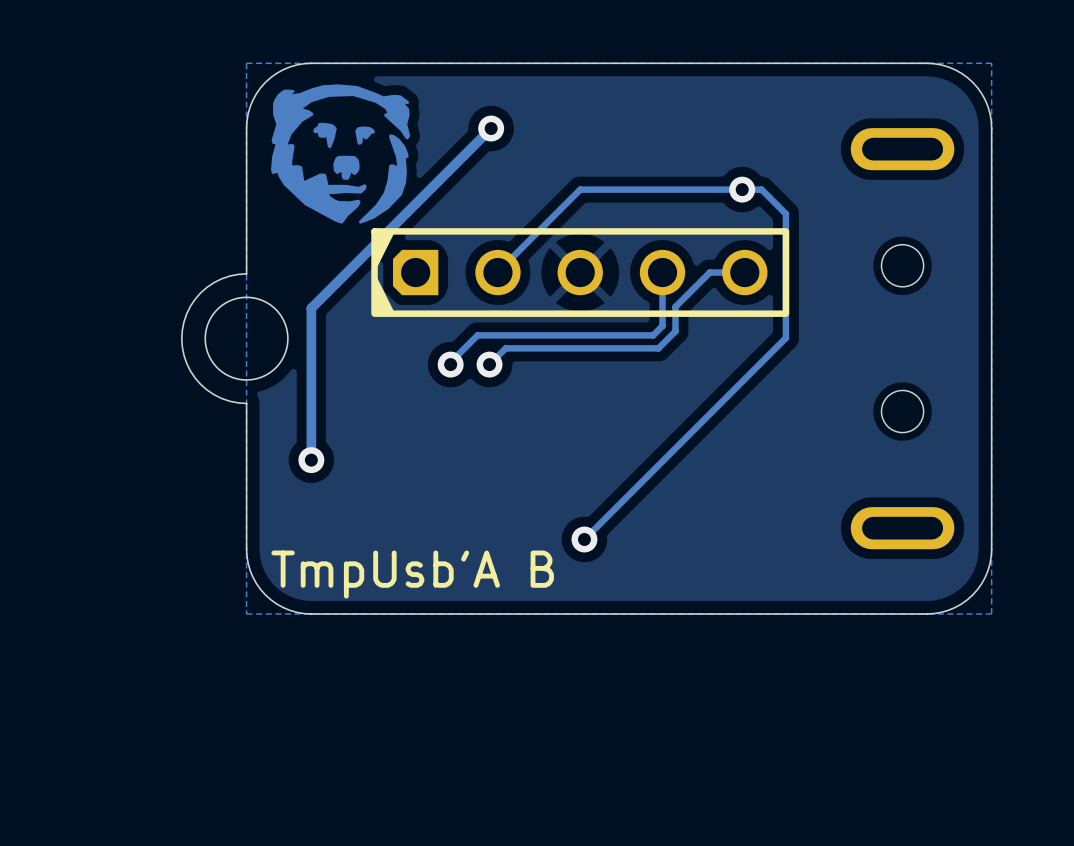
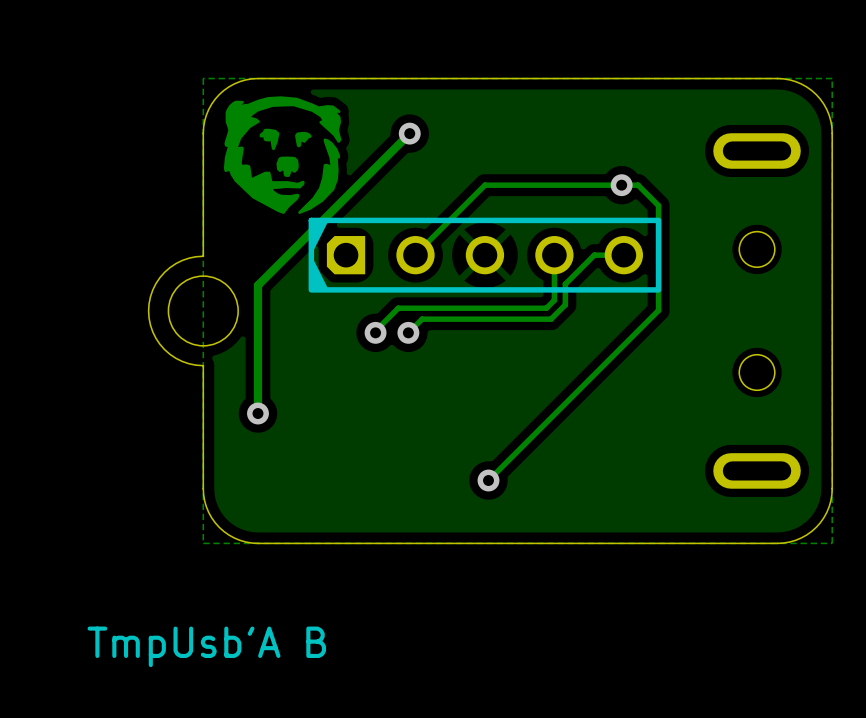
text position: TmpUsb'A B (412, 574) -> TmpUsb'A B (206, 646)

